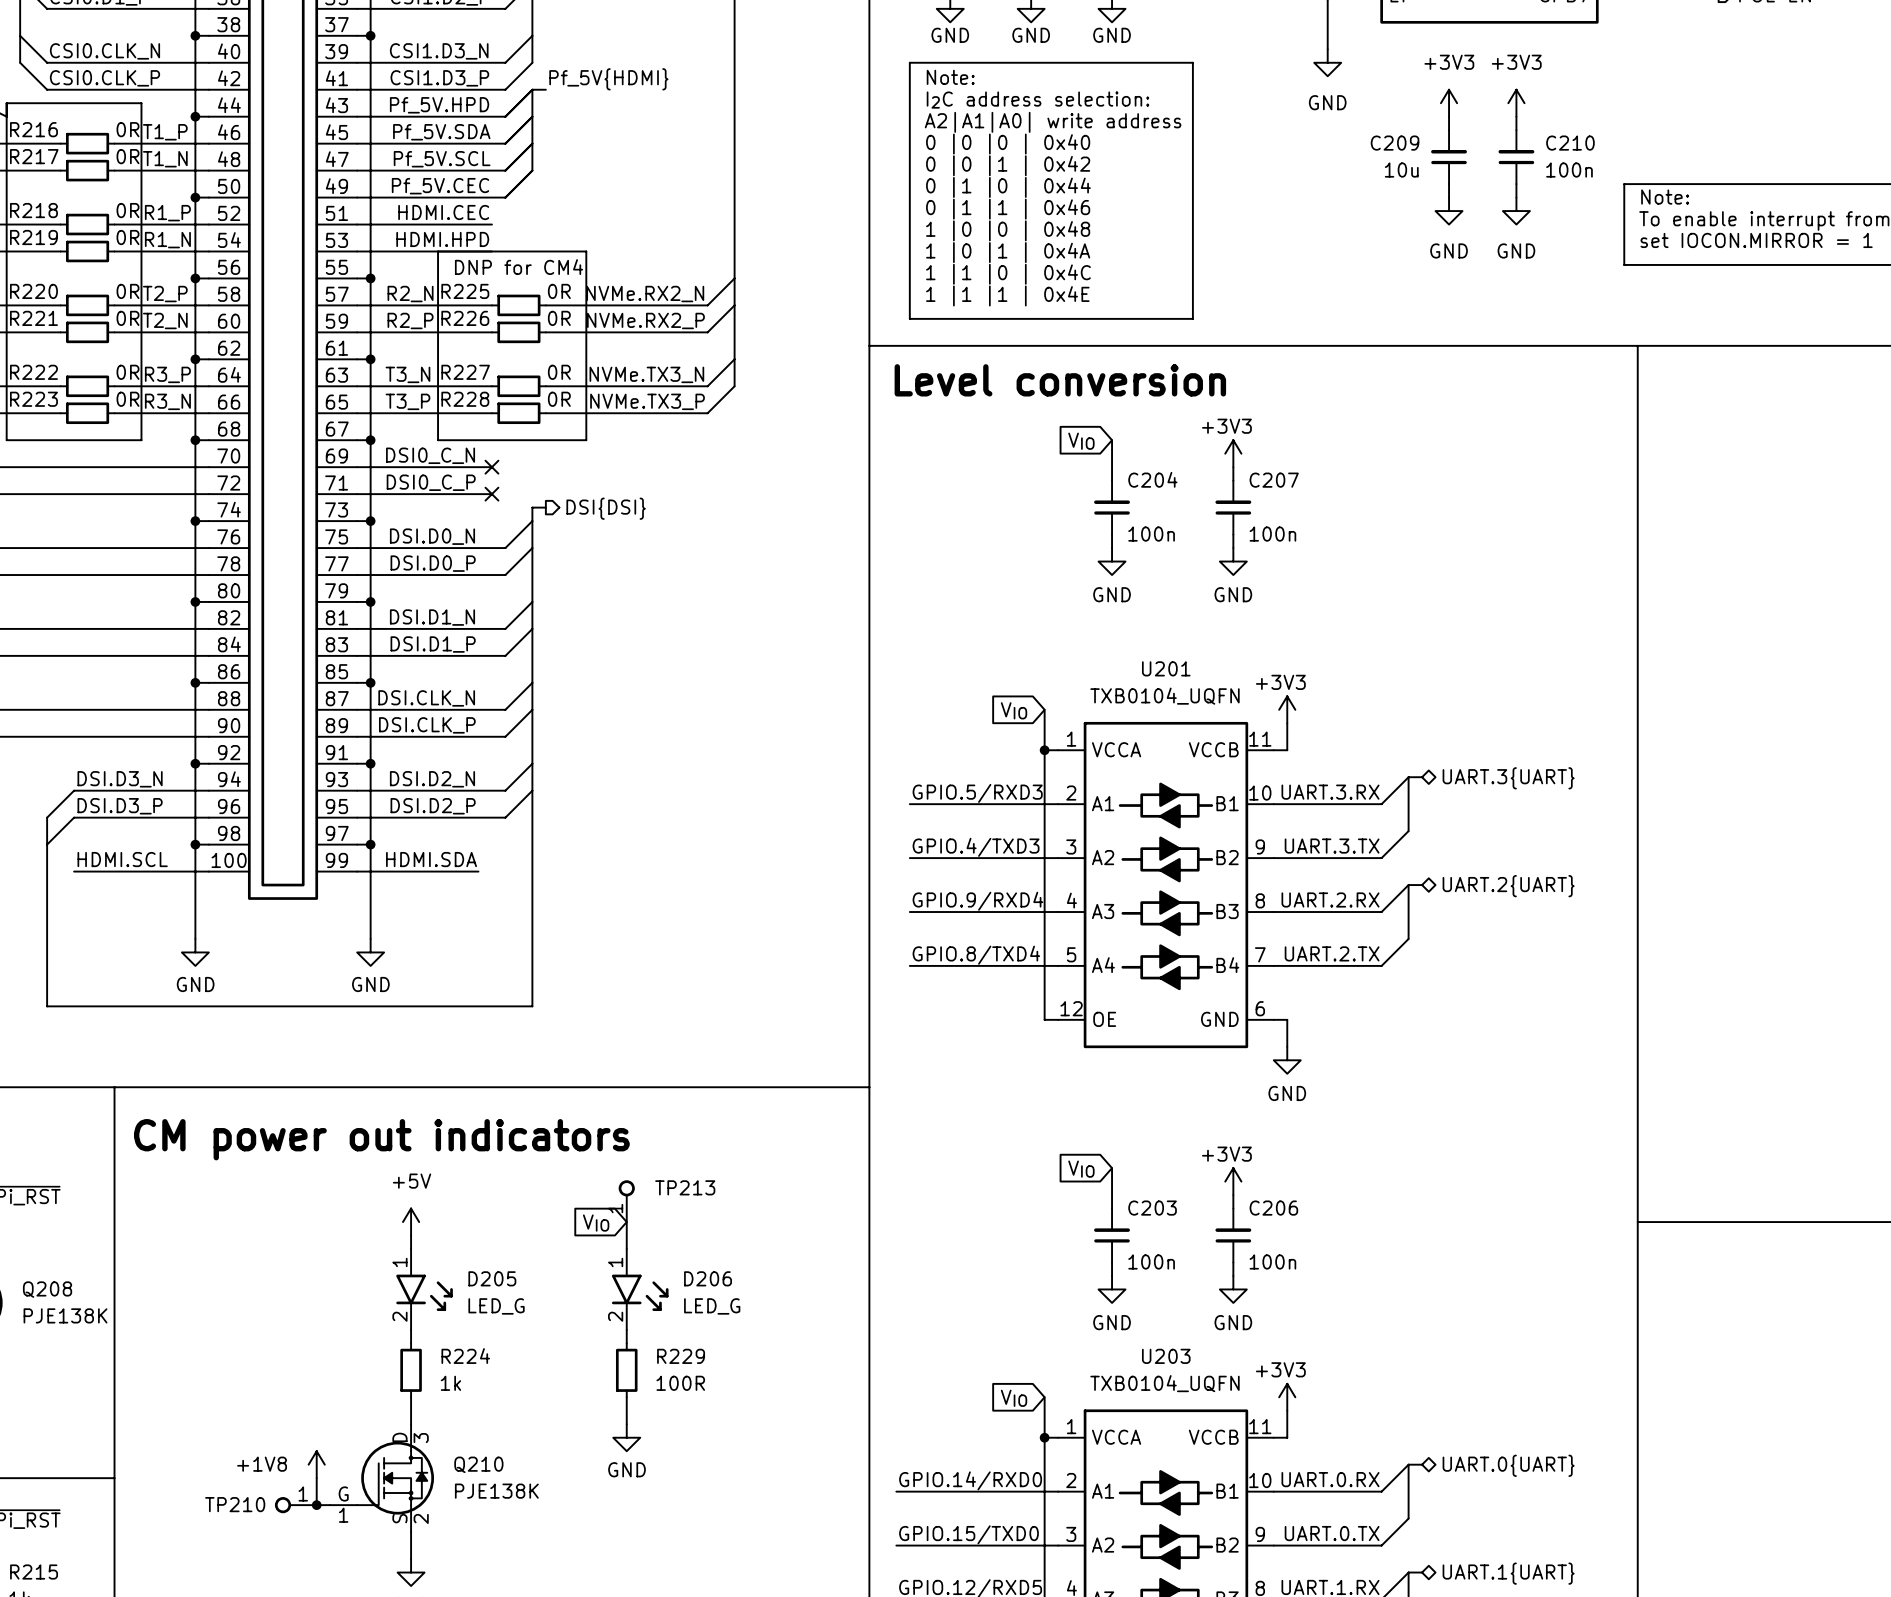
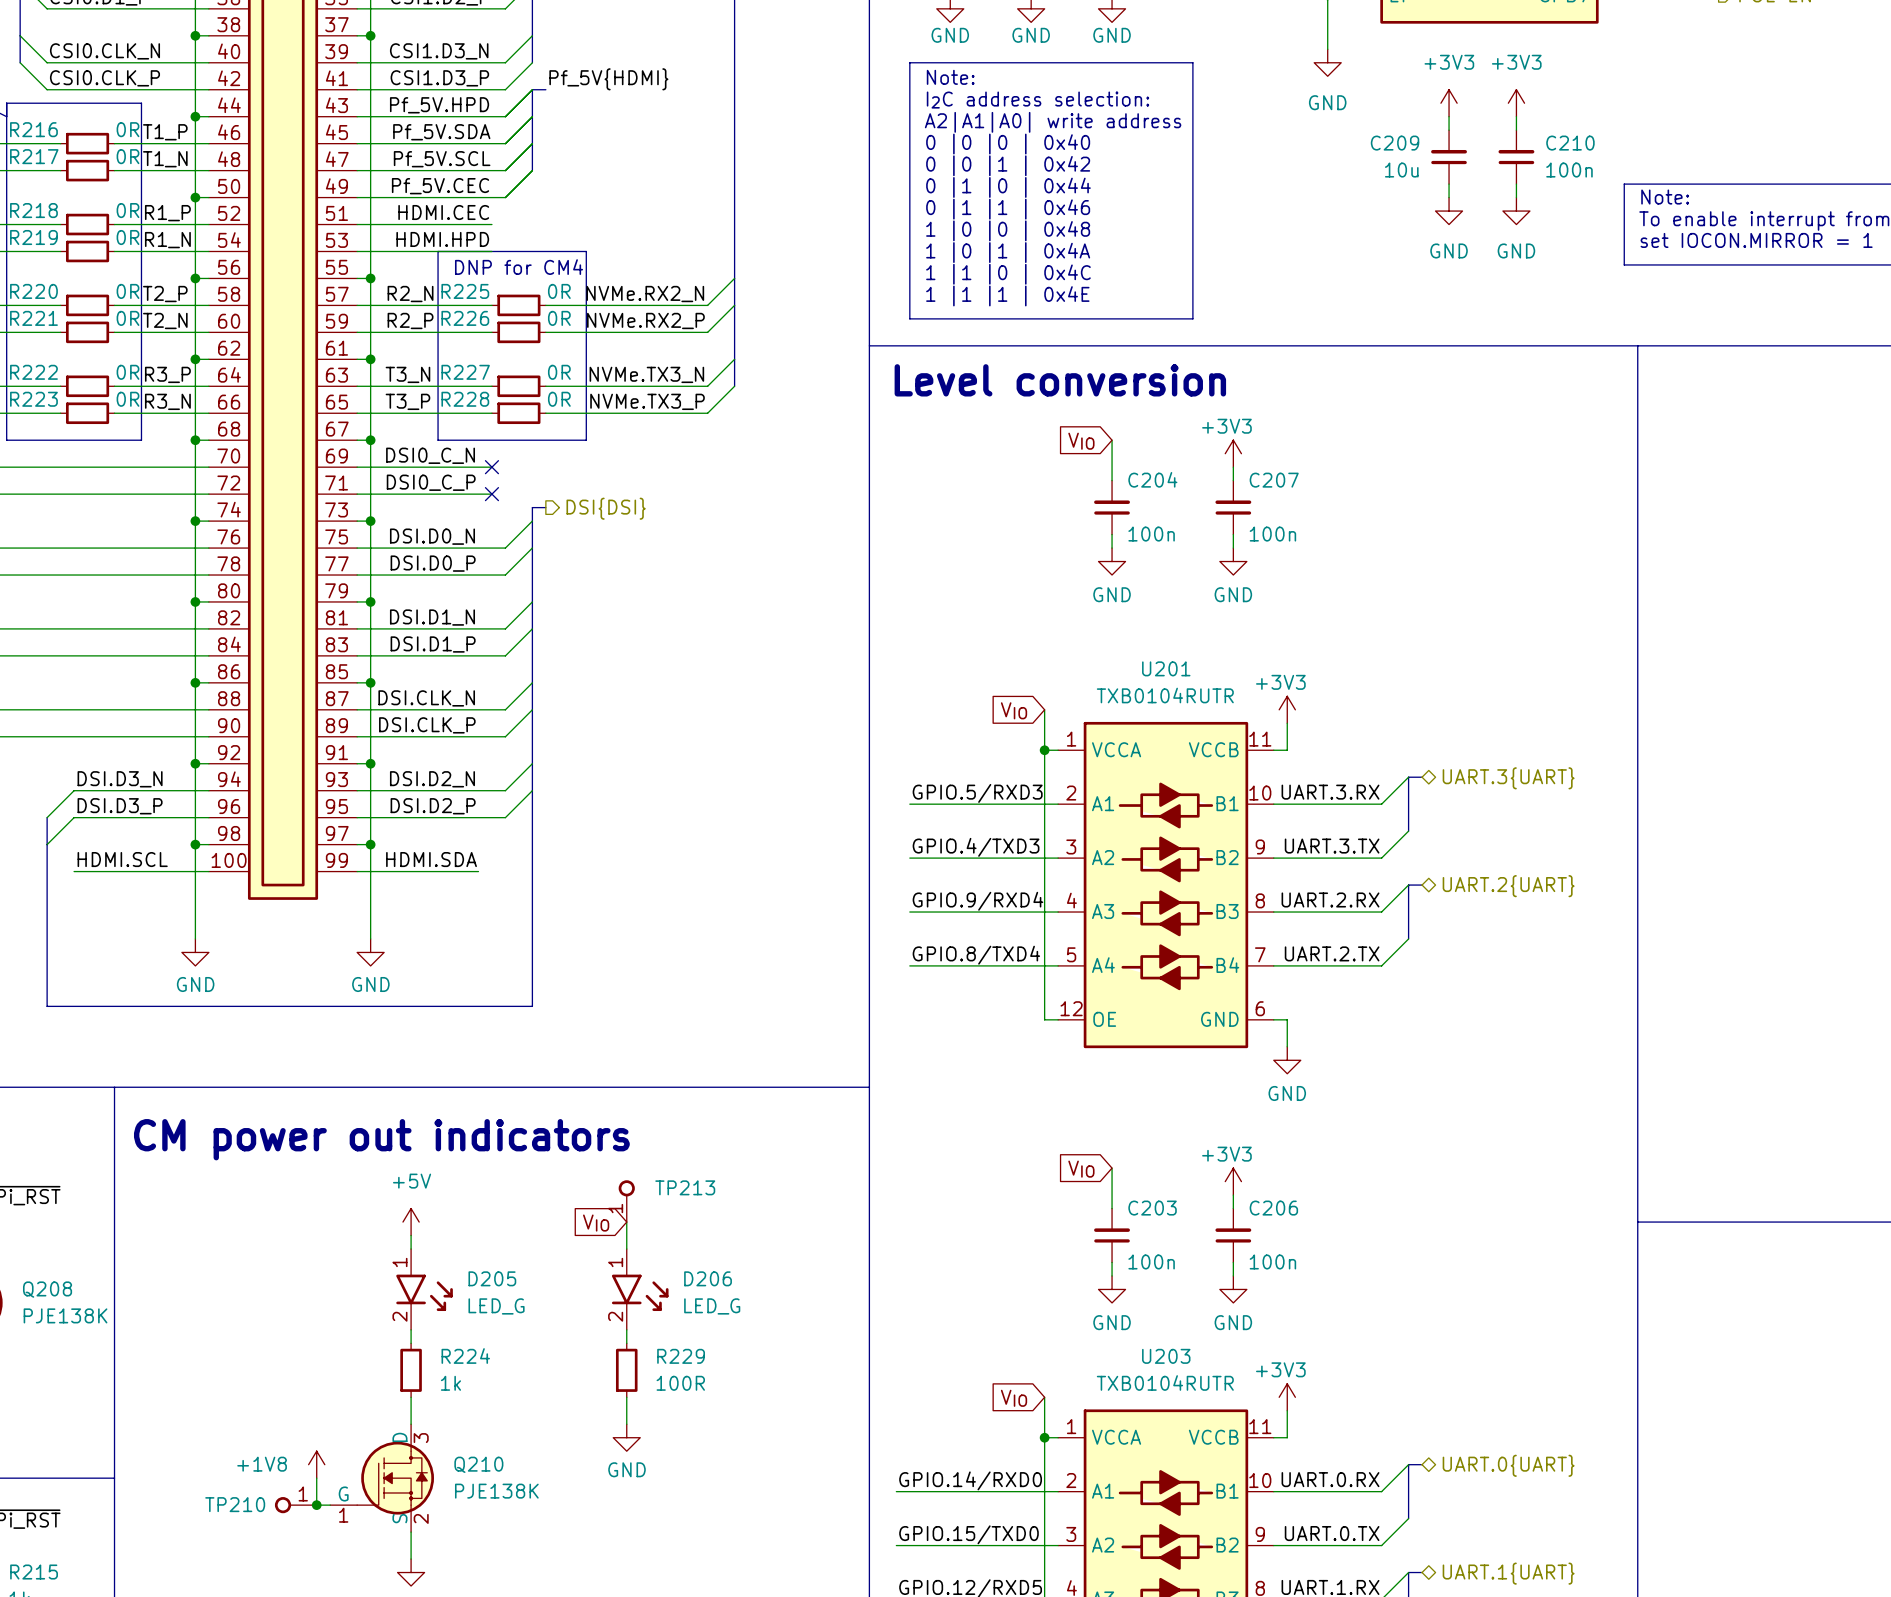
U201 text: none -> TXB0104RUTR (1165, 695)
U201 value: TXB0104_UQFN (1164, 696) -> none
U203 text: none -> TXB0104RUTR (1165, 1382)
U203 value: TXB0104_UQFN (1164, 1383) -> none

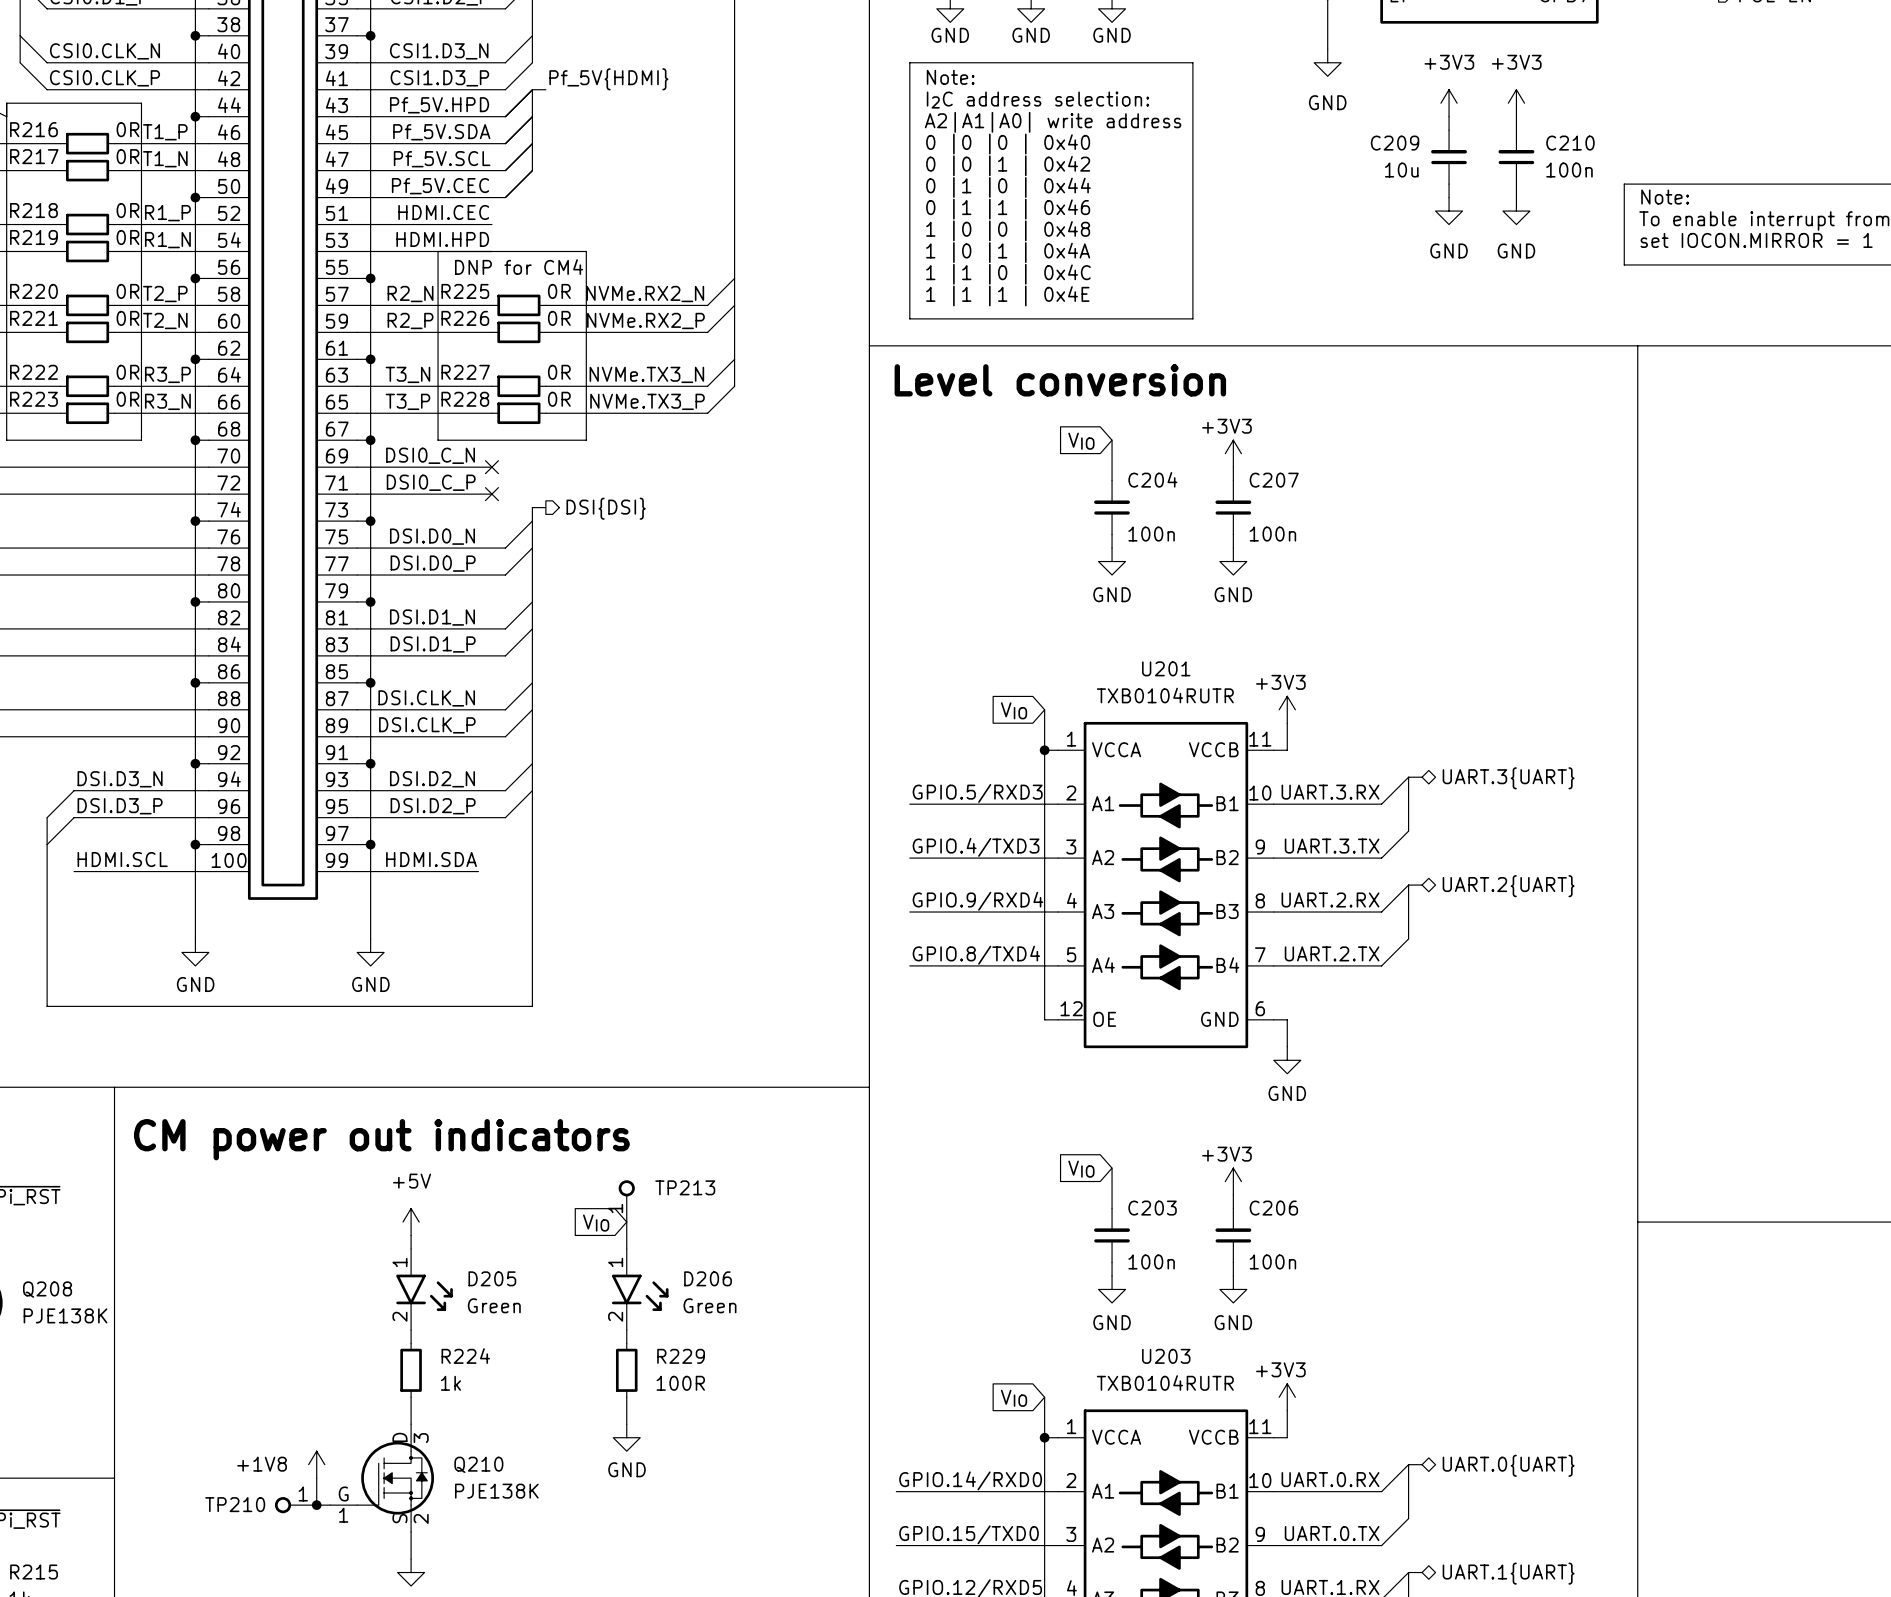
D205 text: none -> Green (494, 1305)
D206 text: none -> Green (709, 1305)
D205 value: LED_G (496, 1306) -> none
D206 value: LED_G (712, 1306) -> none

